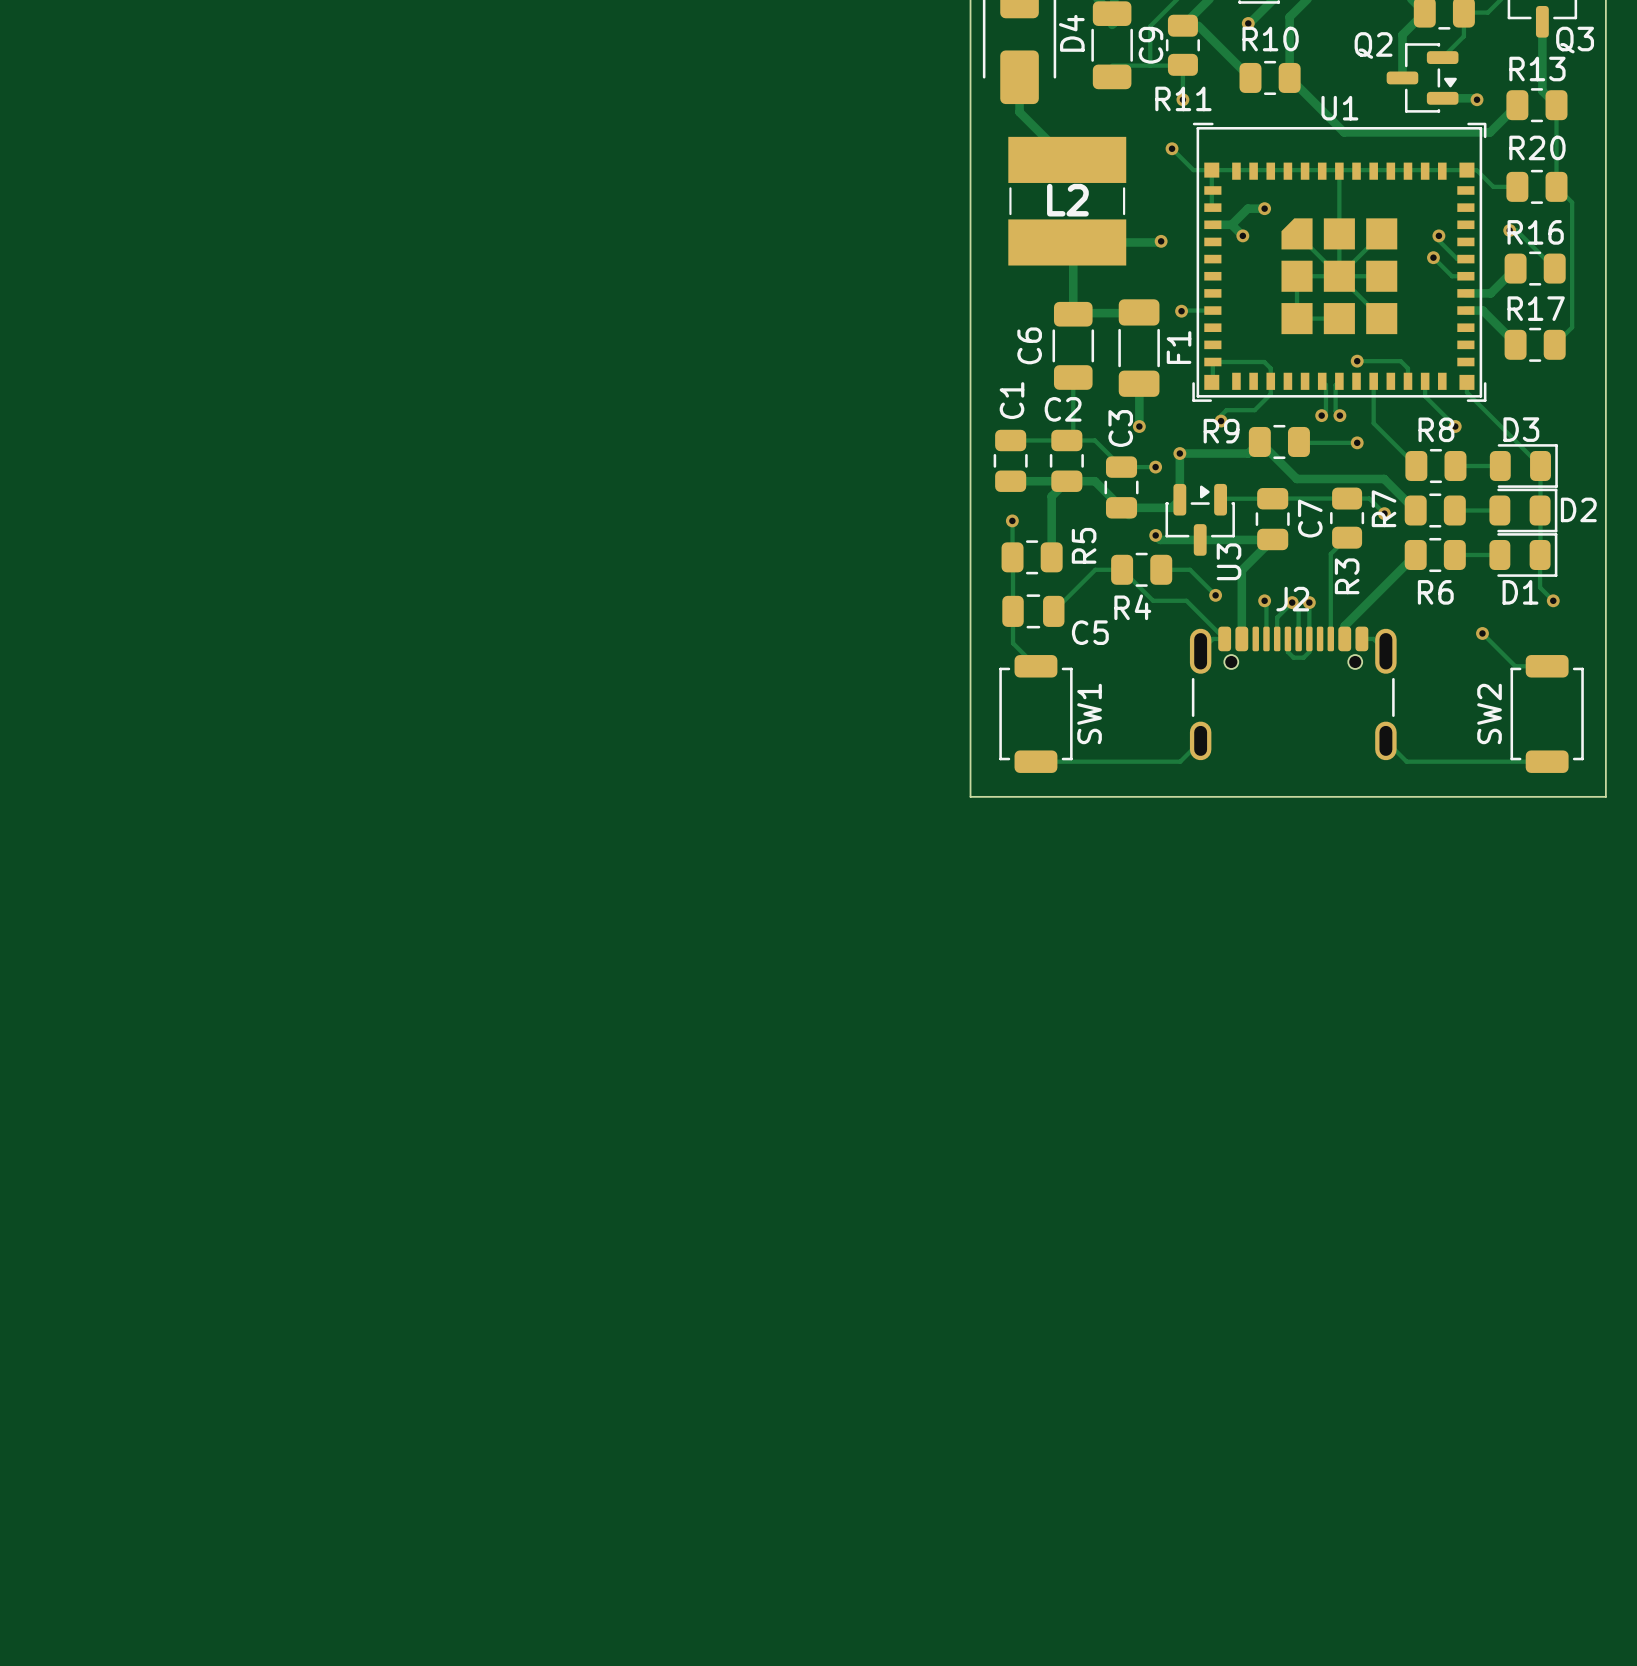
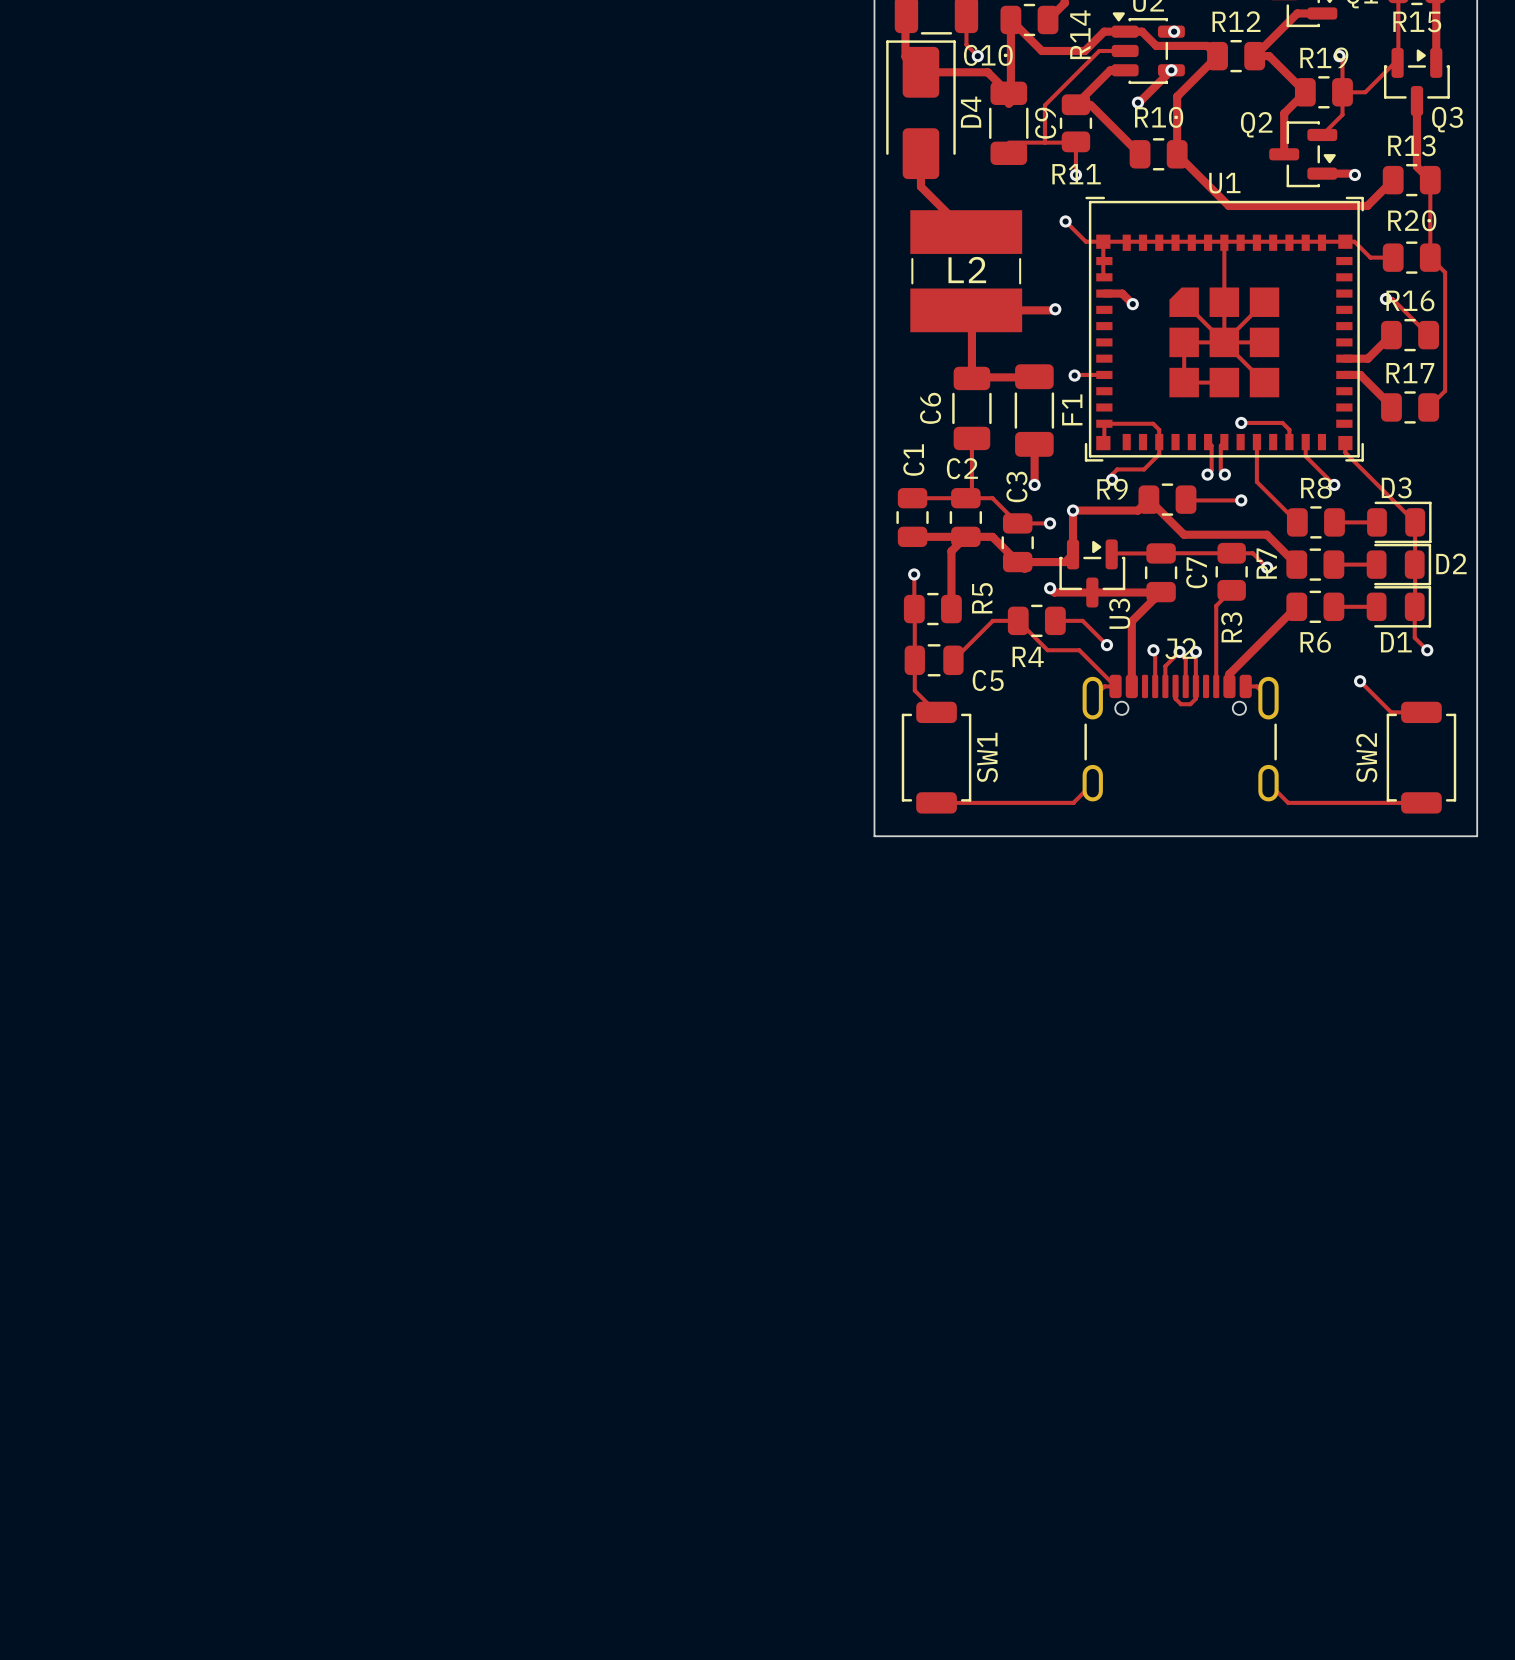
track: (1264, 208) (1247, 208) (1231, 224) -> none
via: (1264, 208) -> none
track: (1438, 235) (1438, 240) (1457, 259) (1465, 259) -> none
via: (1438, 235) -> none
track: (1433, 257) (1452, 276) (1465, 276) -> none
via: (1433, 257) -> none

